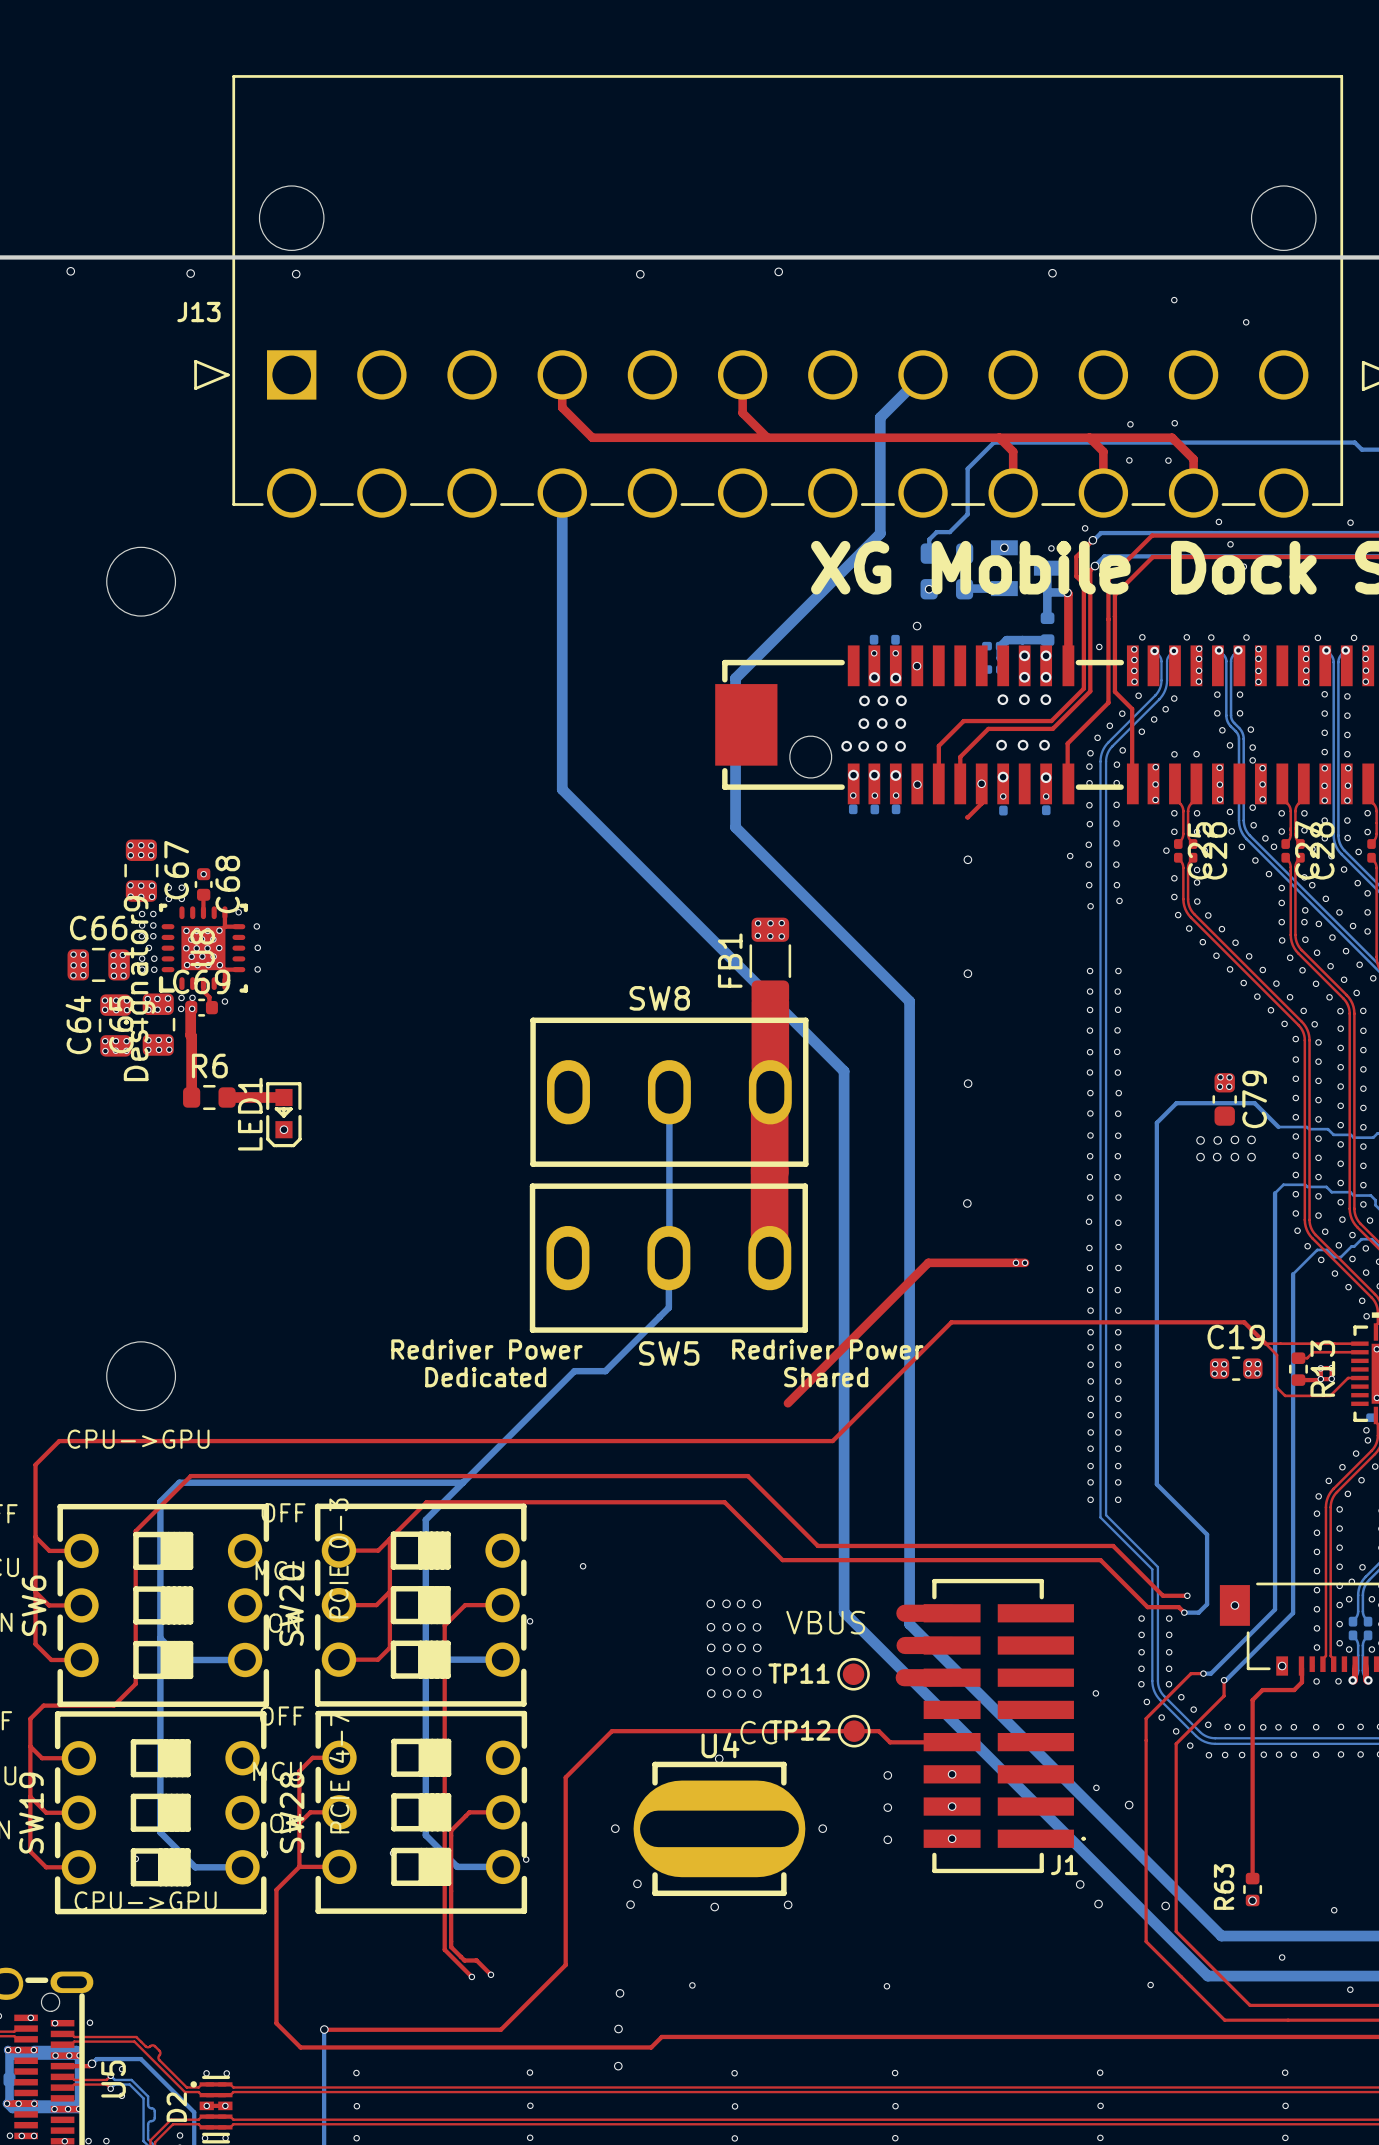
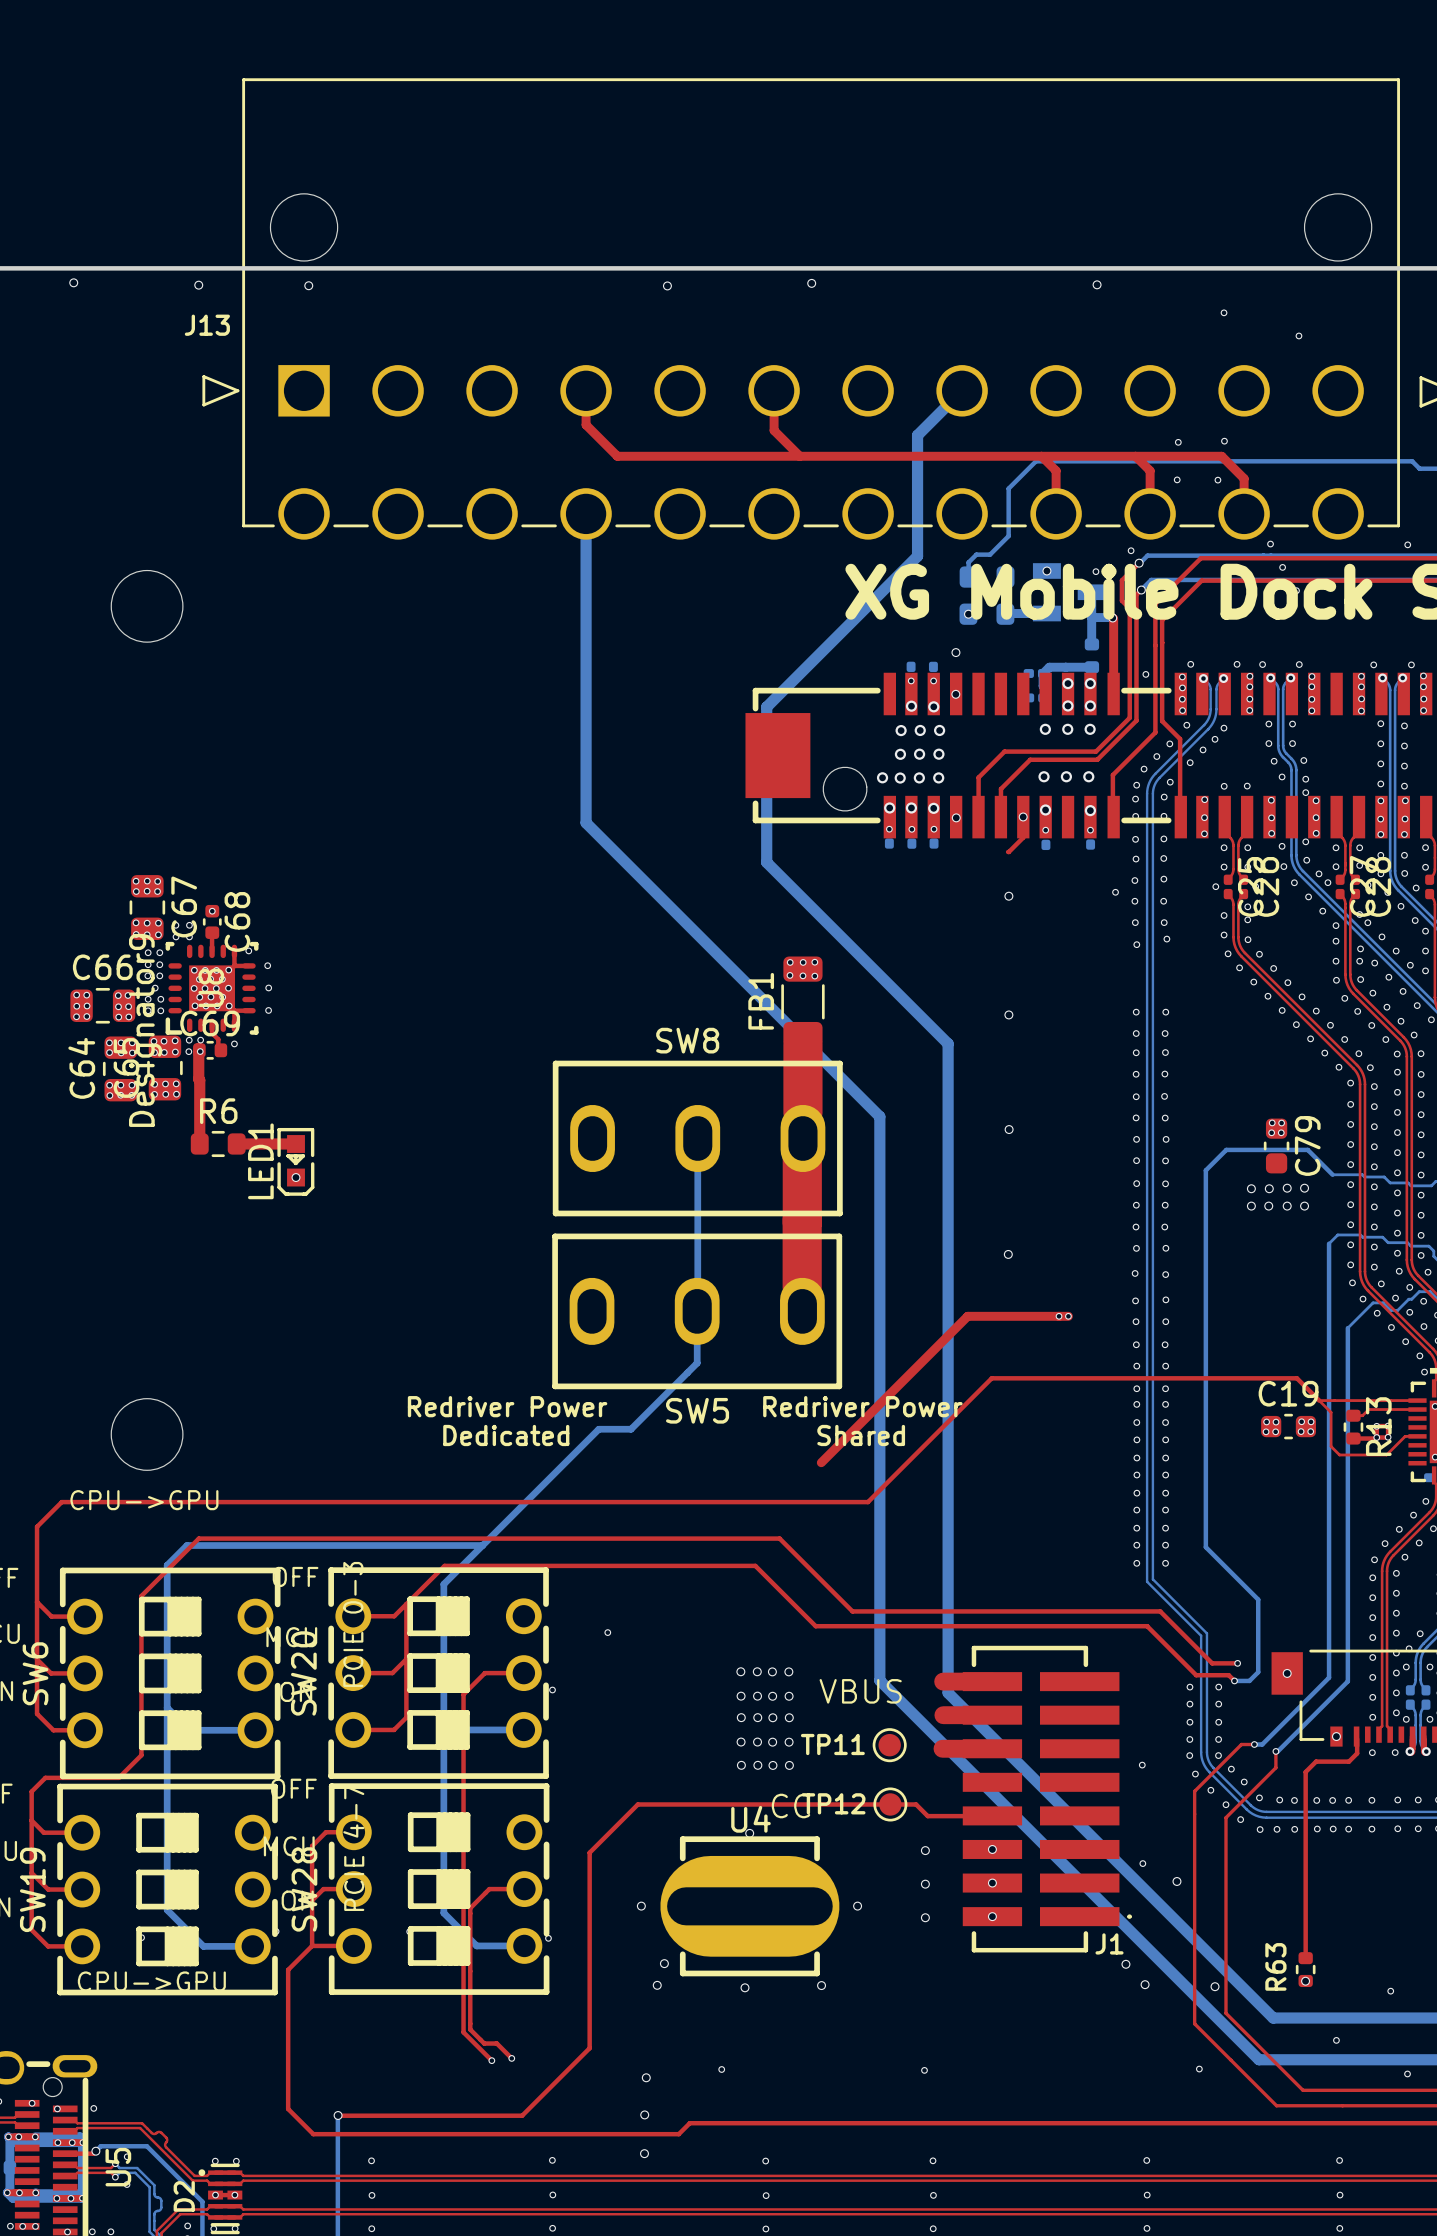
via: (1366, 1430) -> none

